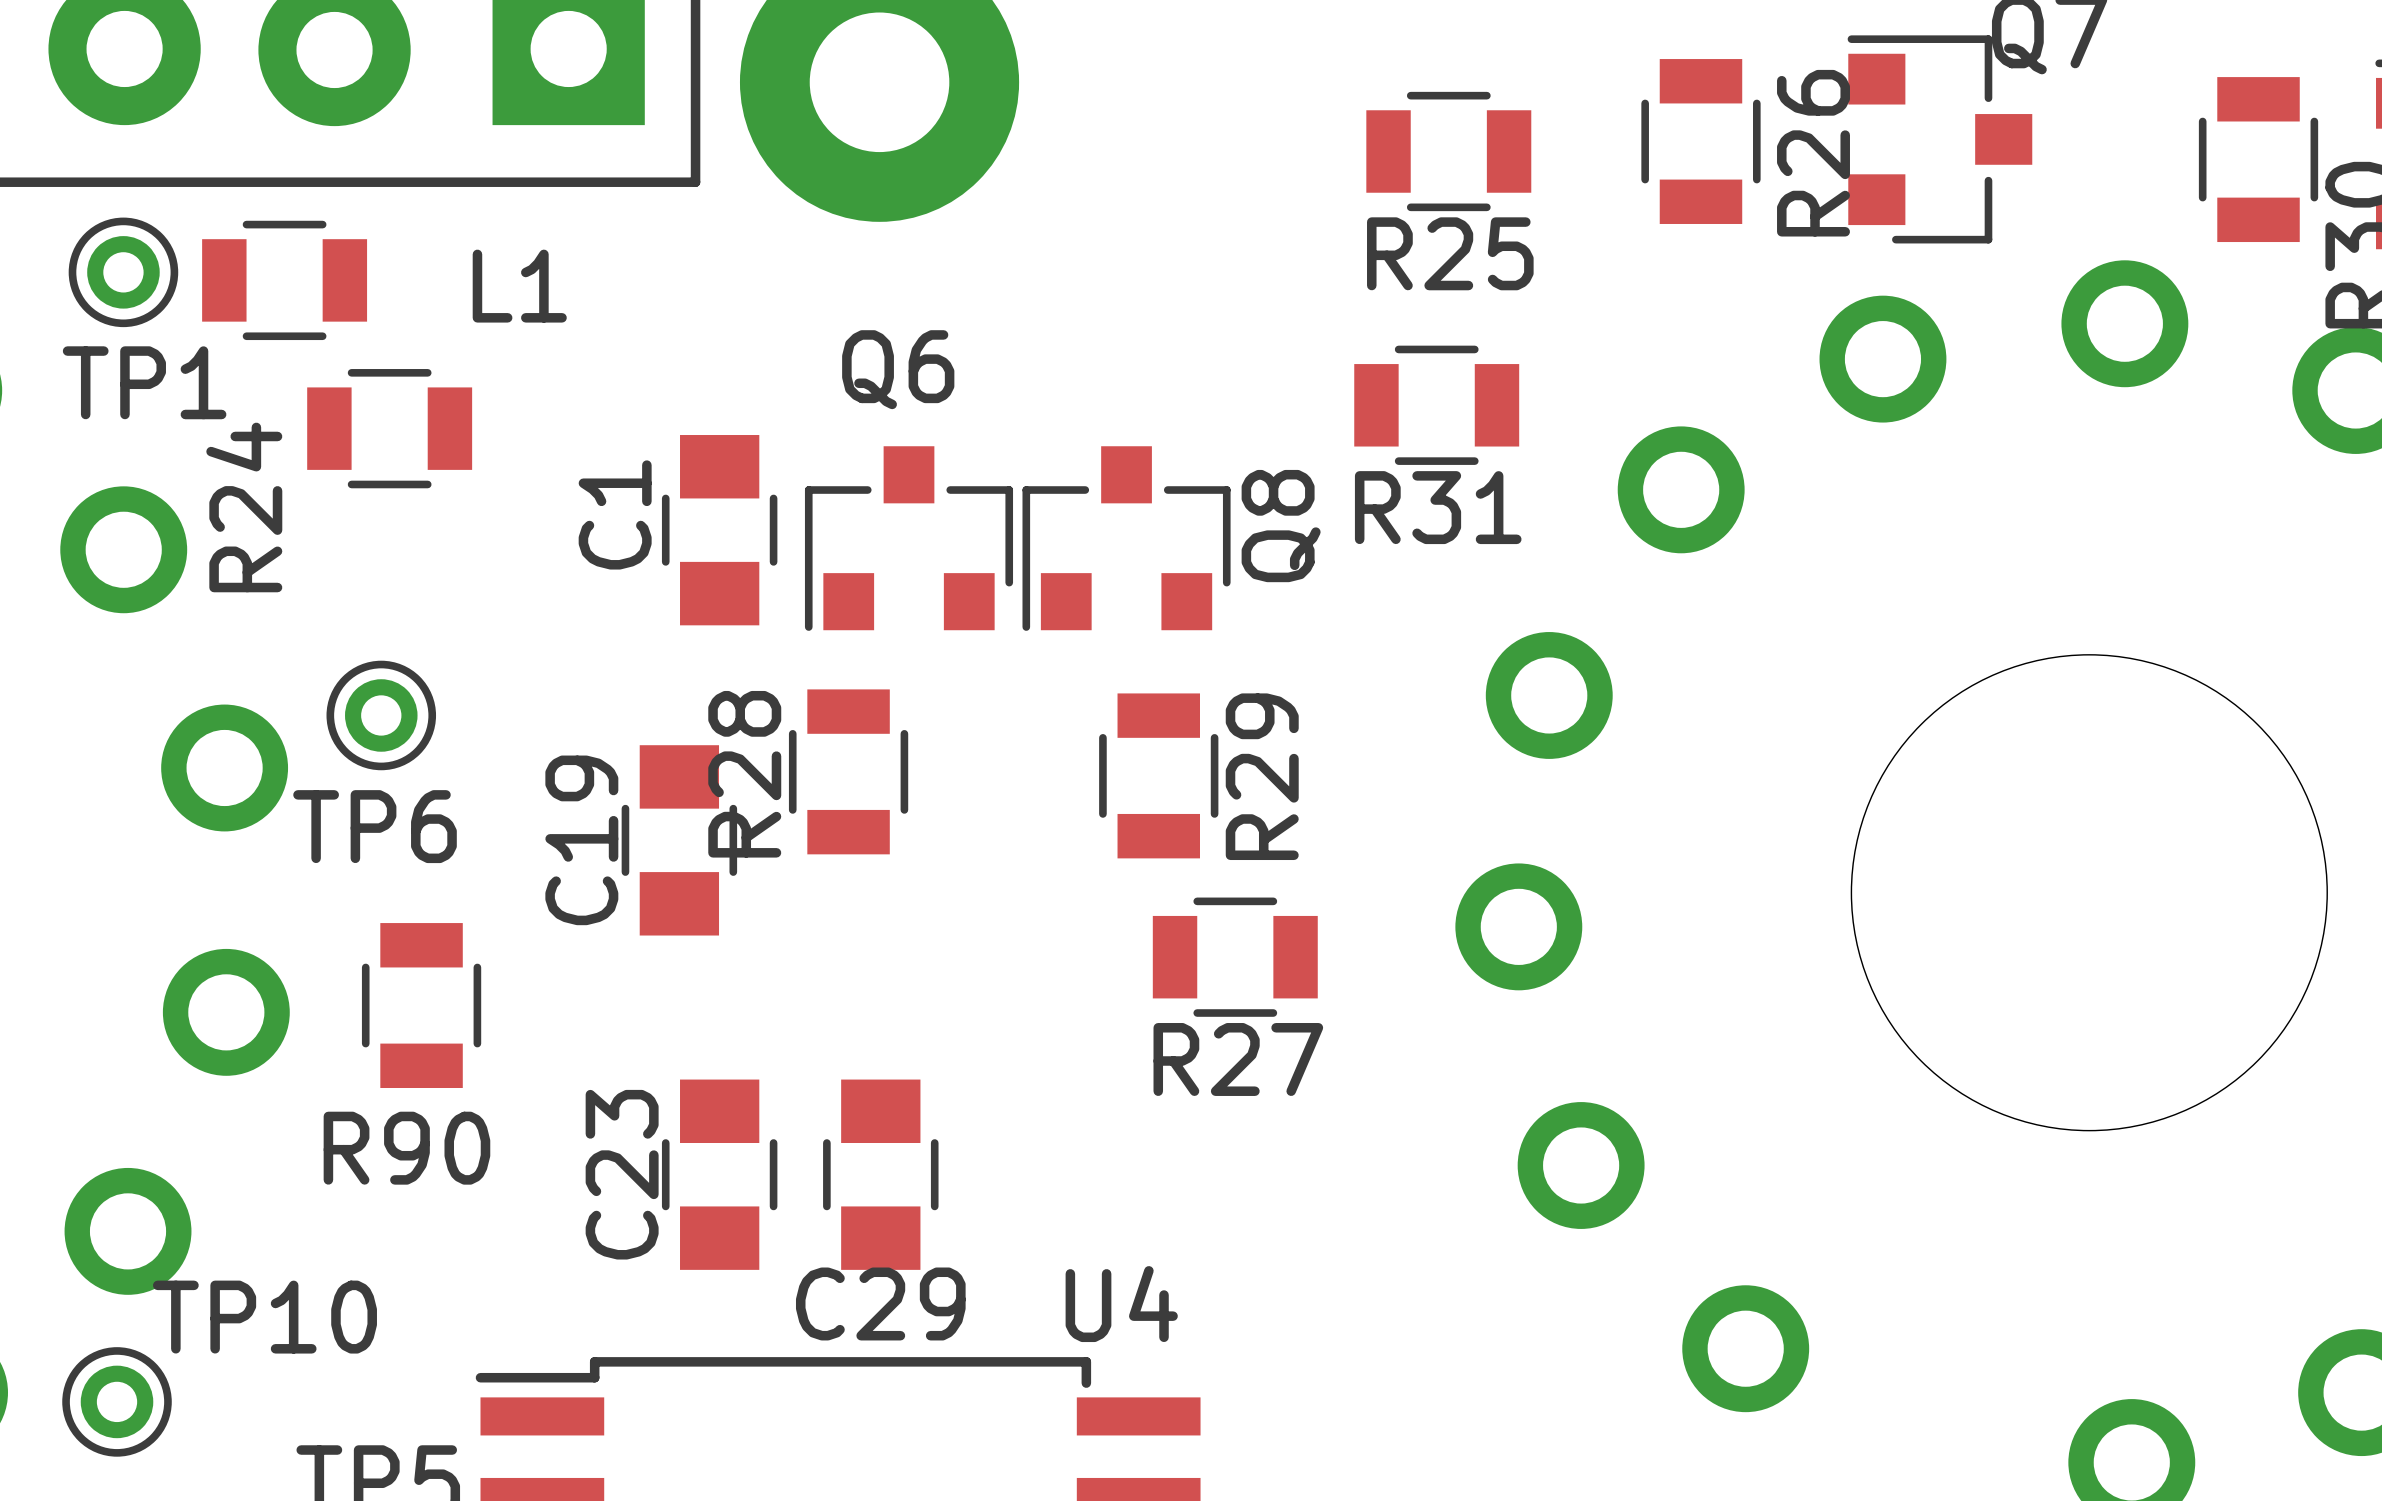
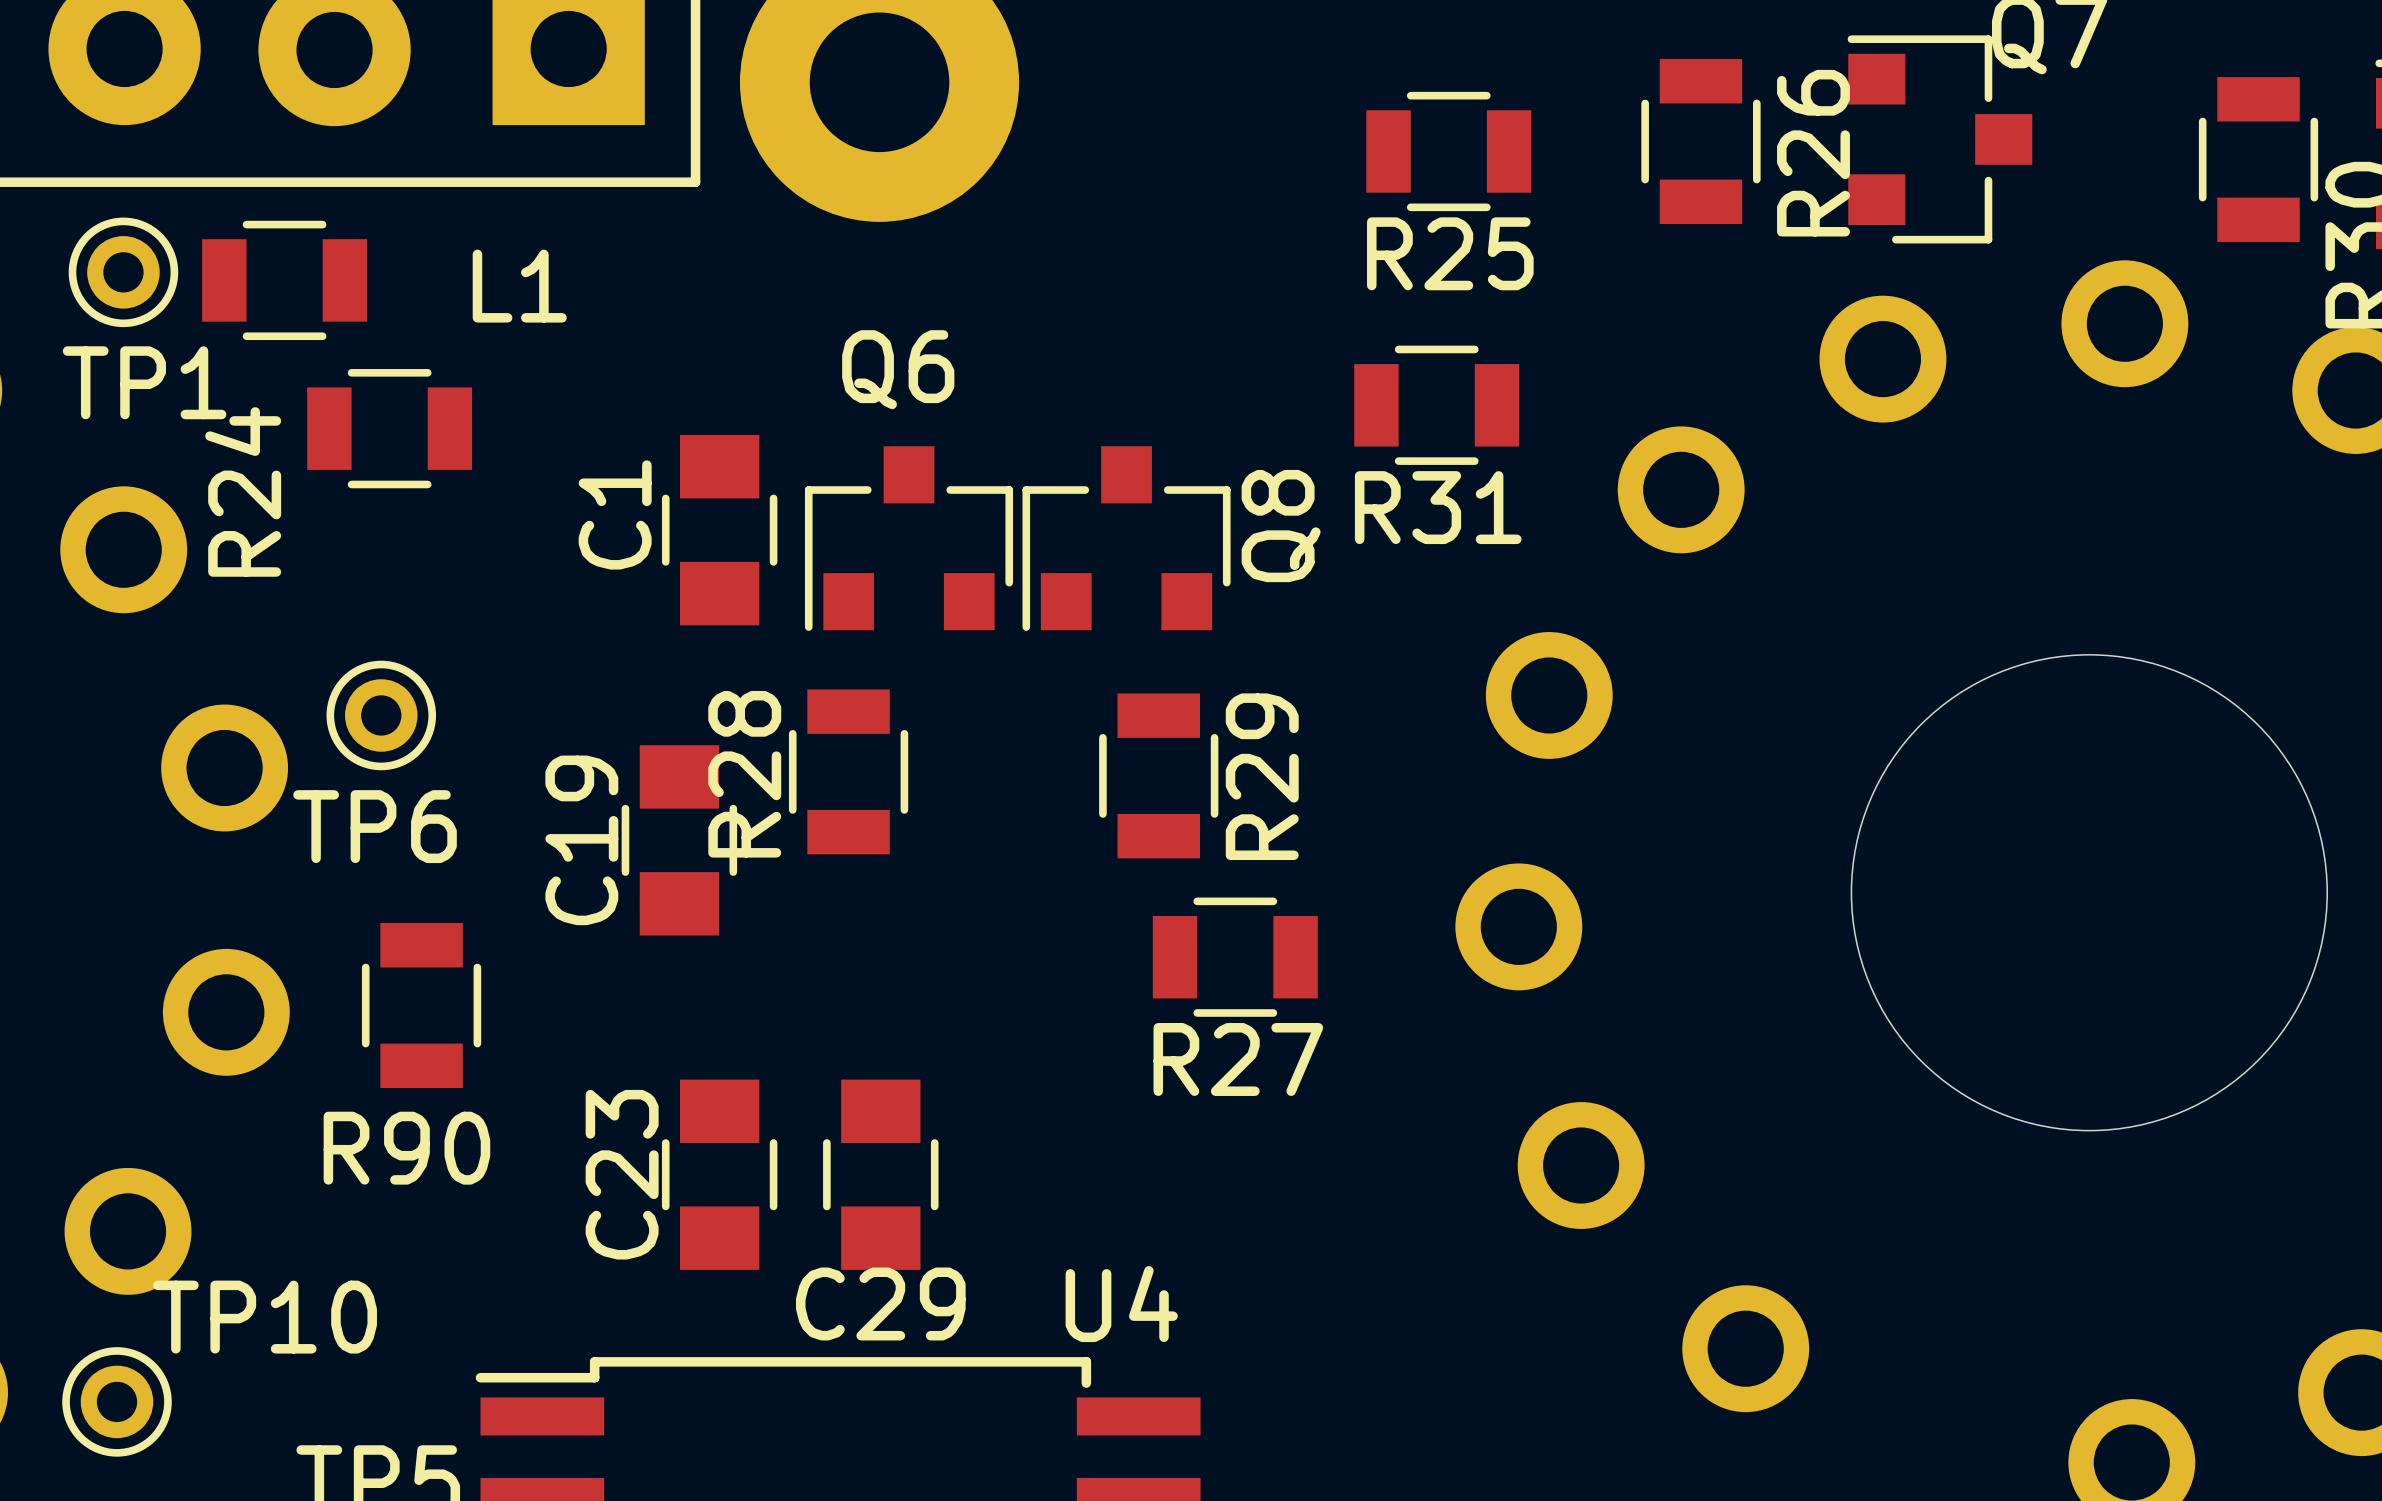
R24 name position: R24 (244, 507) -> R24 (243, 491)

